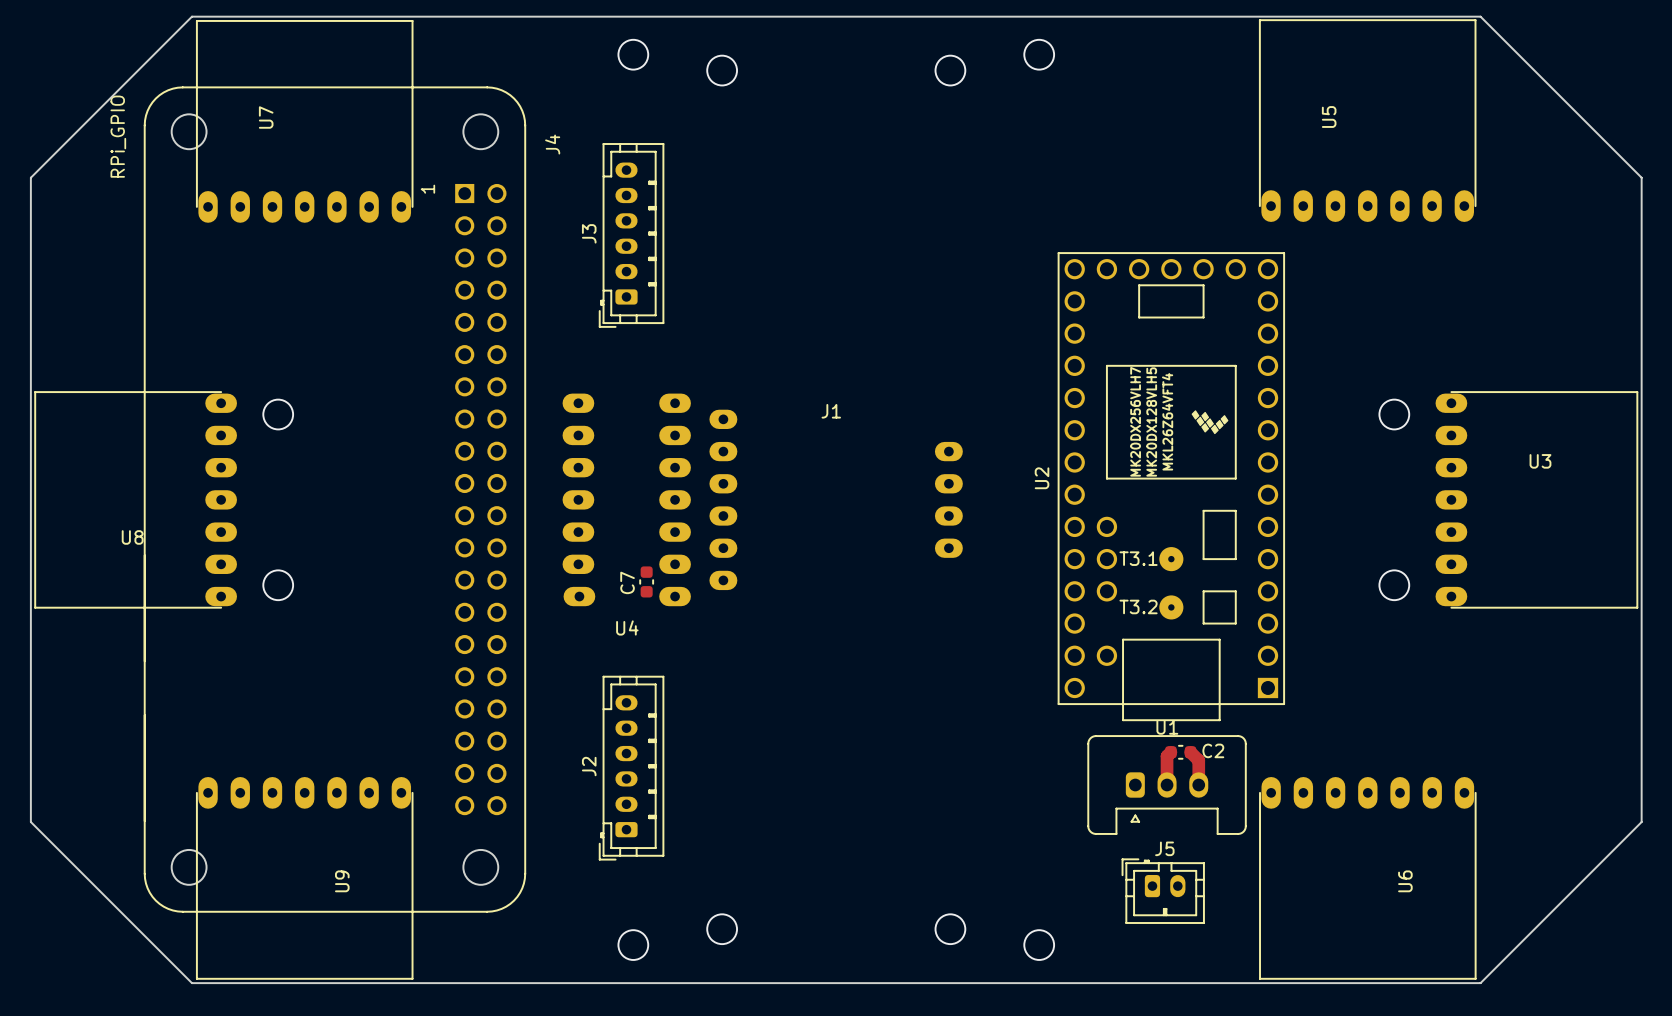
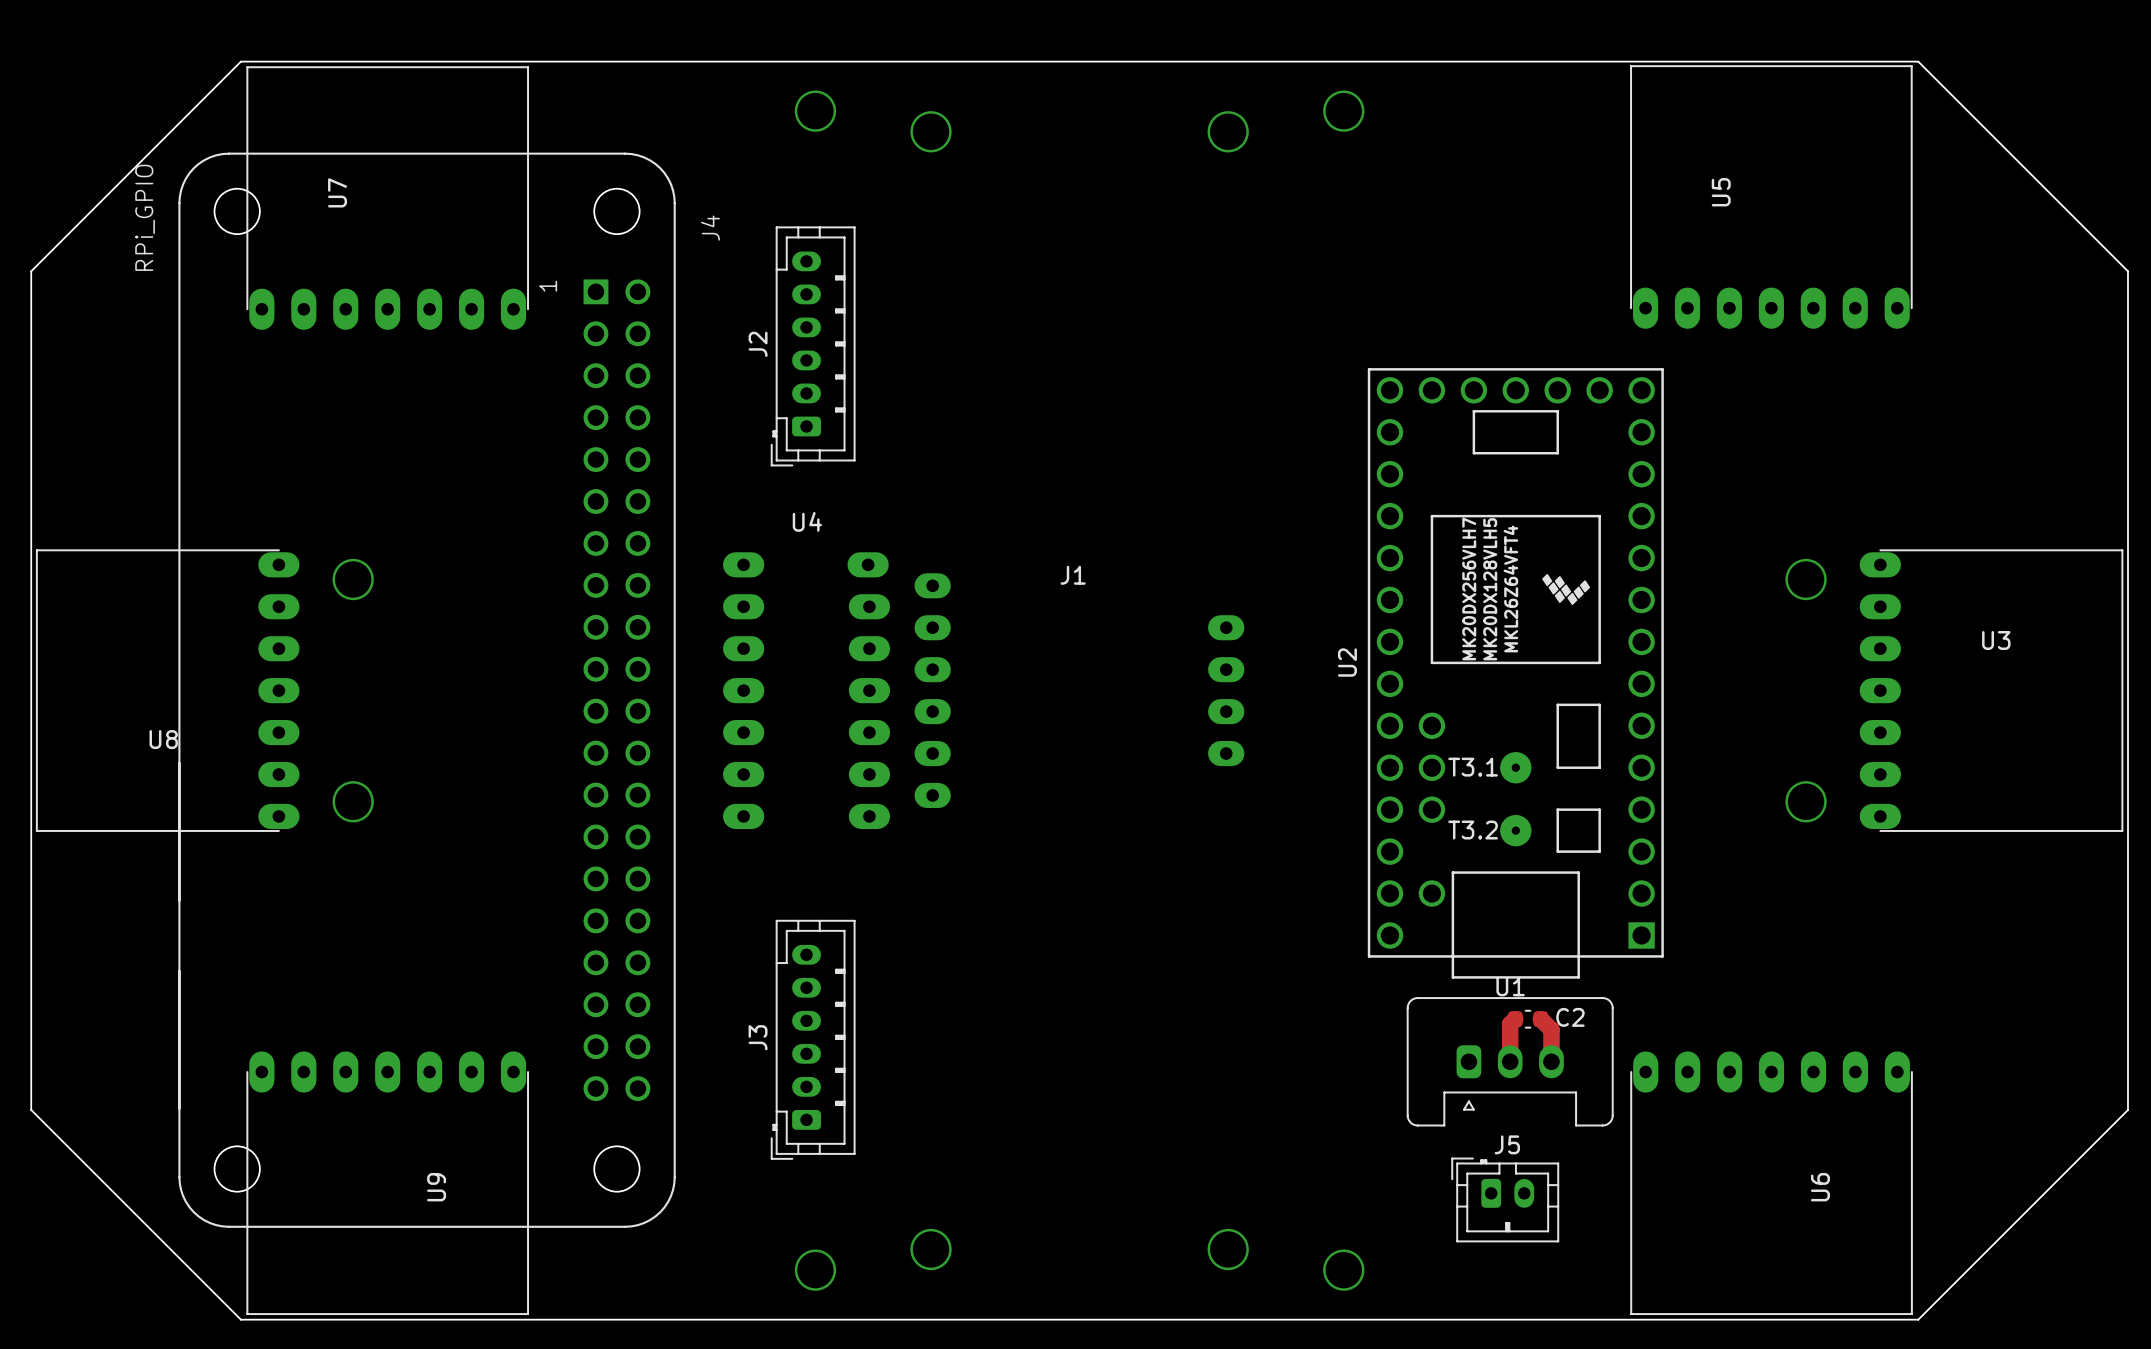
J3 name: J3 (589, 233) -> J2 (758, 344)
U4 rotation: 0° (626, 499) -> 180° (806, 690)
C7: (646, 581) -> none
J2 name: J2 (589, 766) -> J3 (758, 1037)

